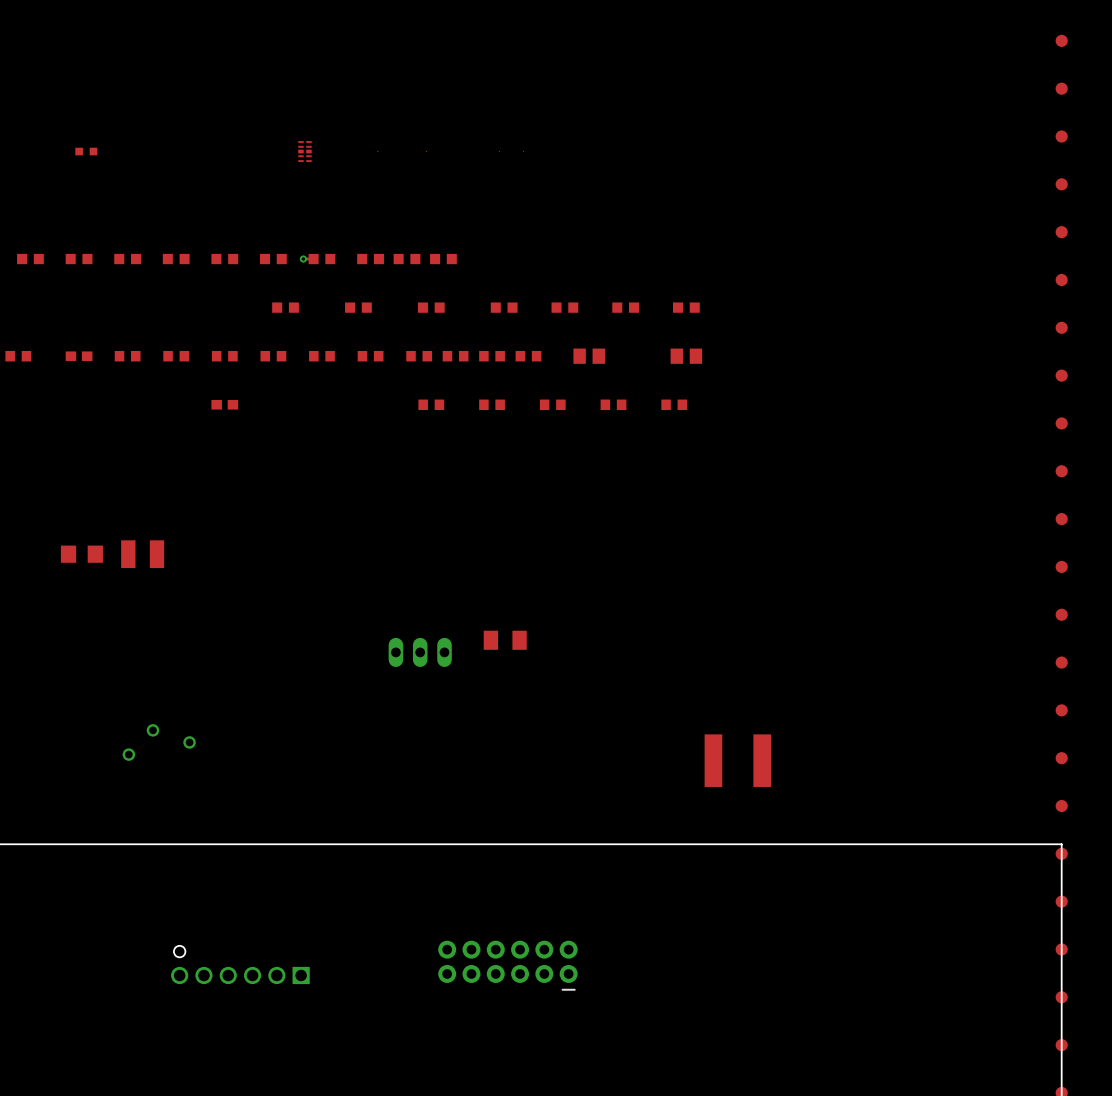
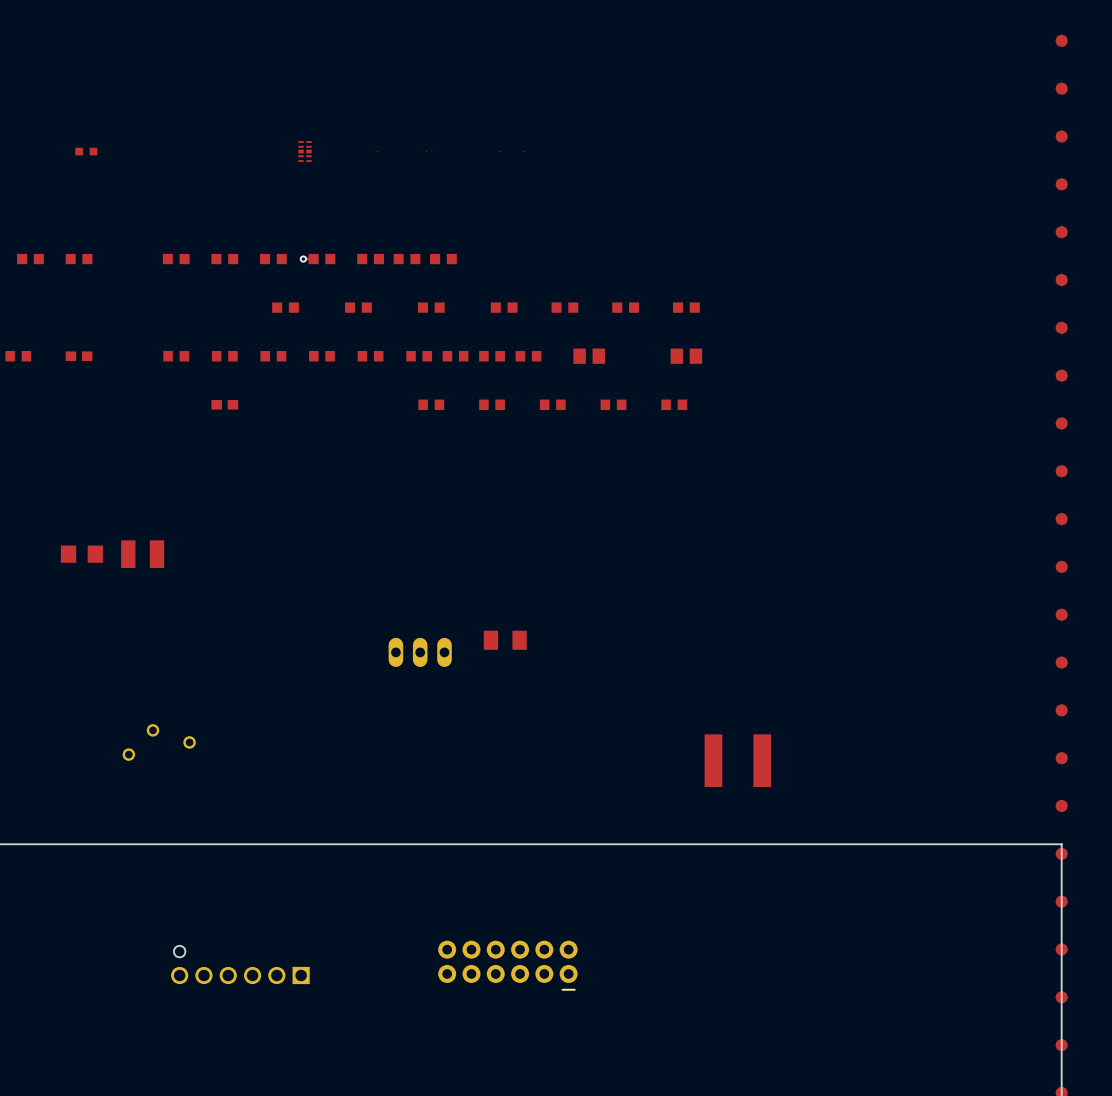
part: (127, 259) -> none
part: (127, 356) -> none

